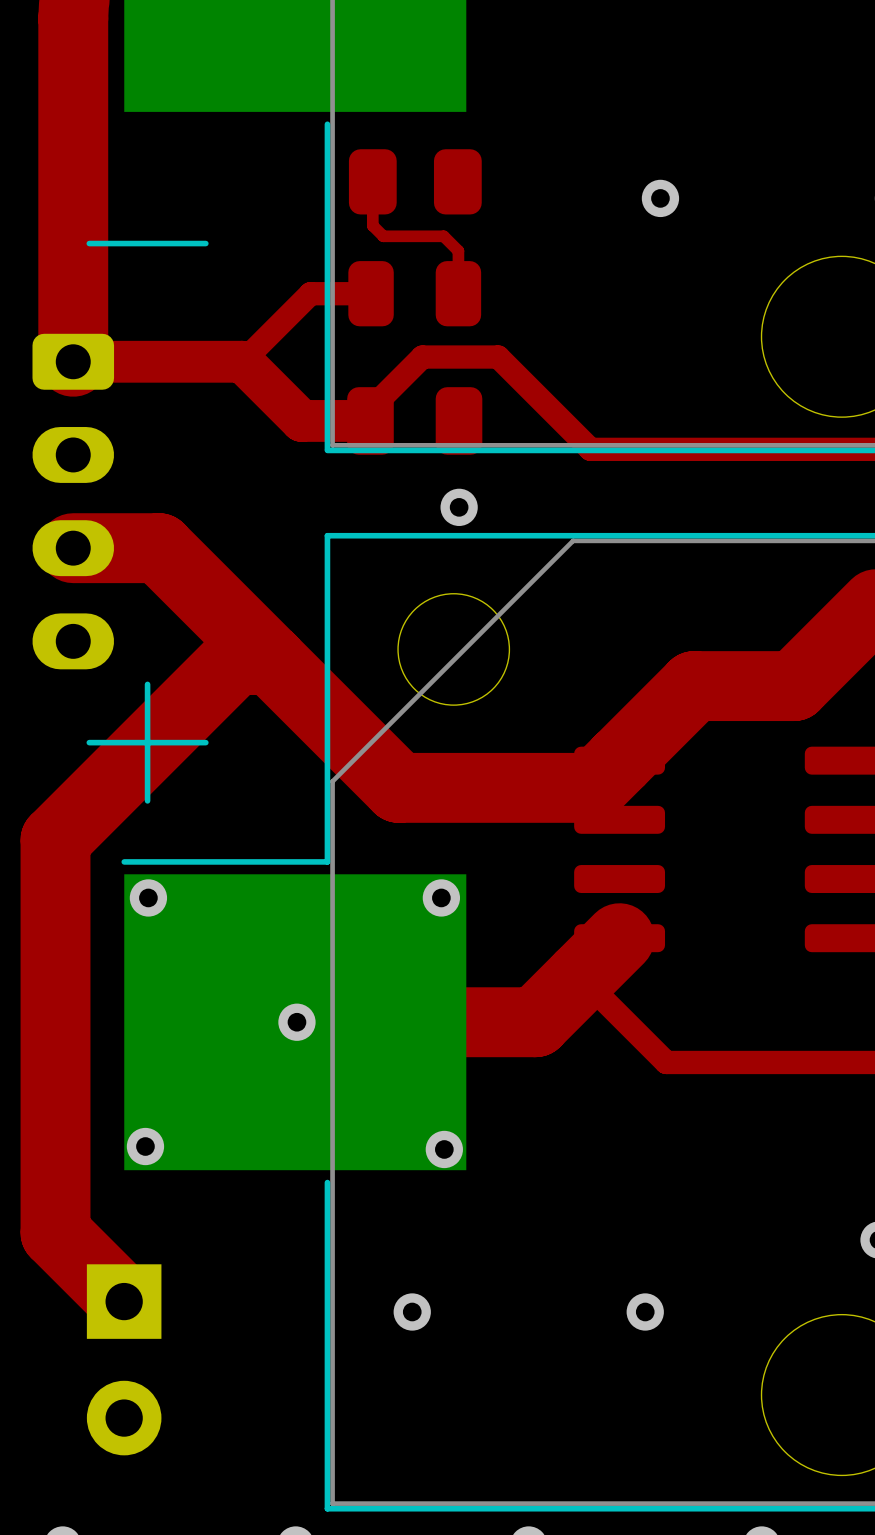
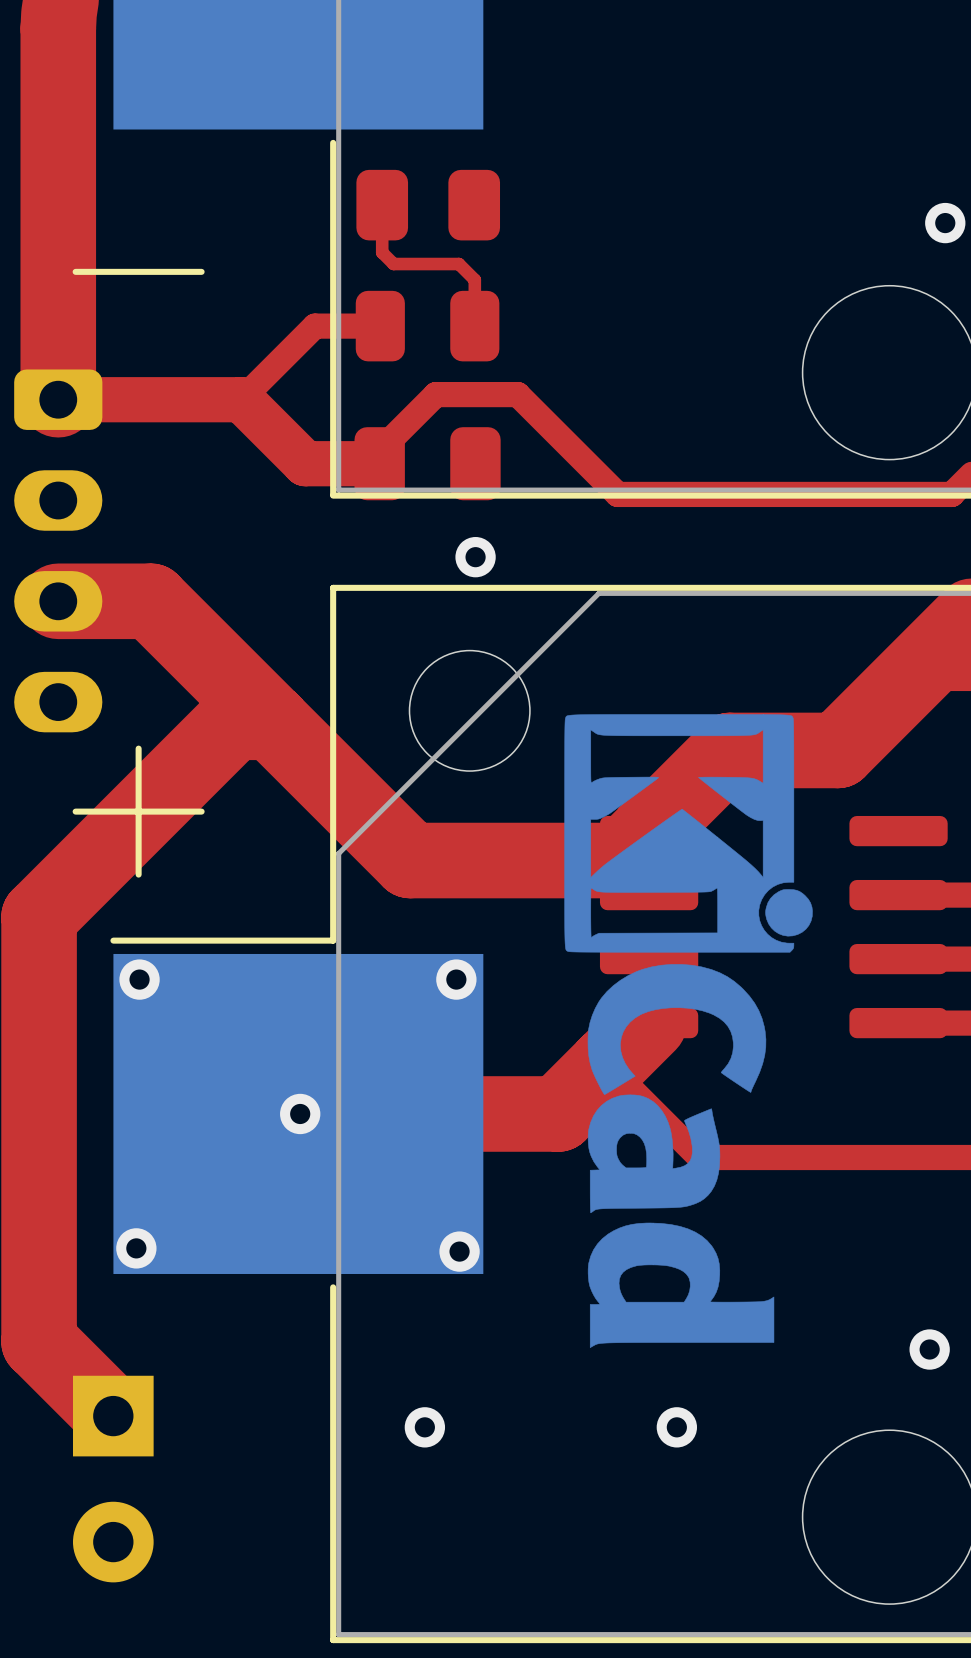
via: (660, 198) -> none
drawing: none -> [564, 714, 813, 1348]

